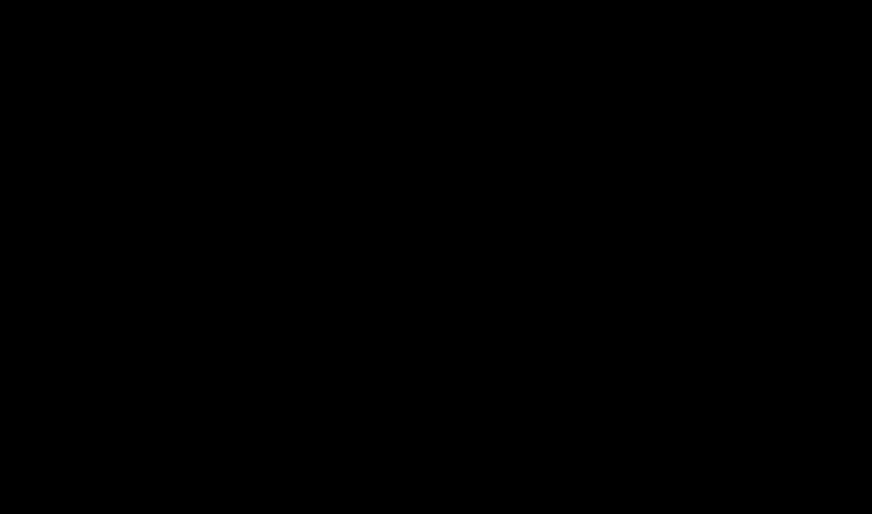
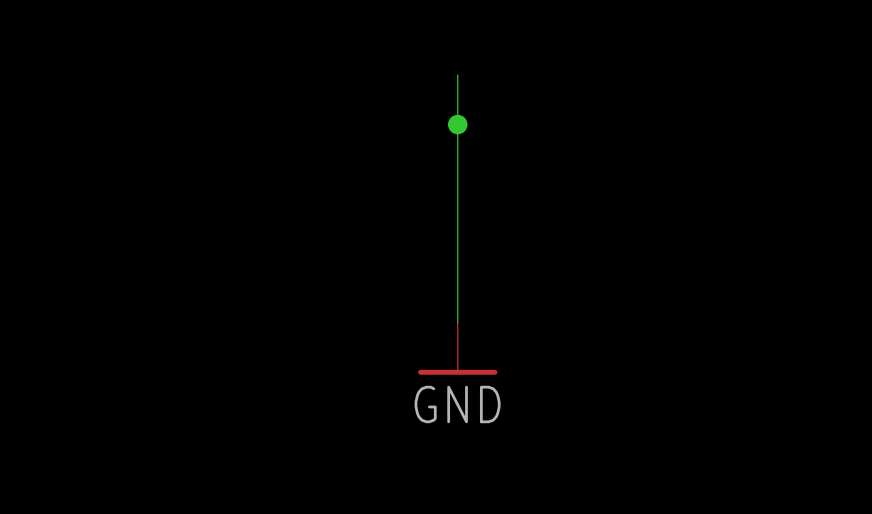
wire: none -> (457, 75) (457, 322)
junction: none -> (457, 124)
power symbol: none -> GND (457, 348)

